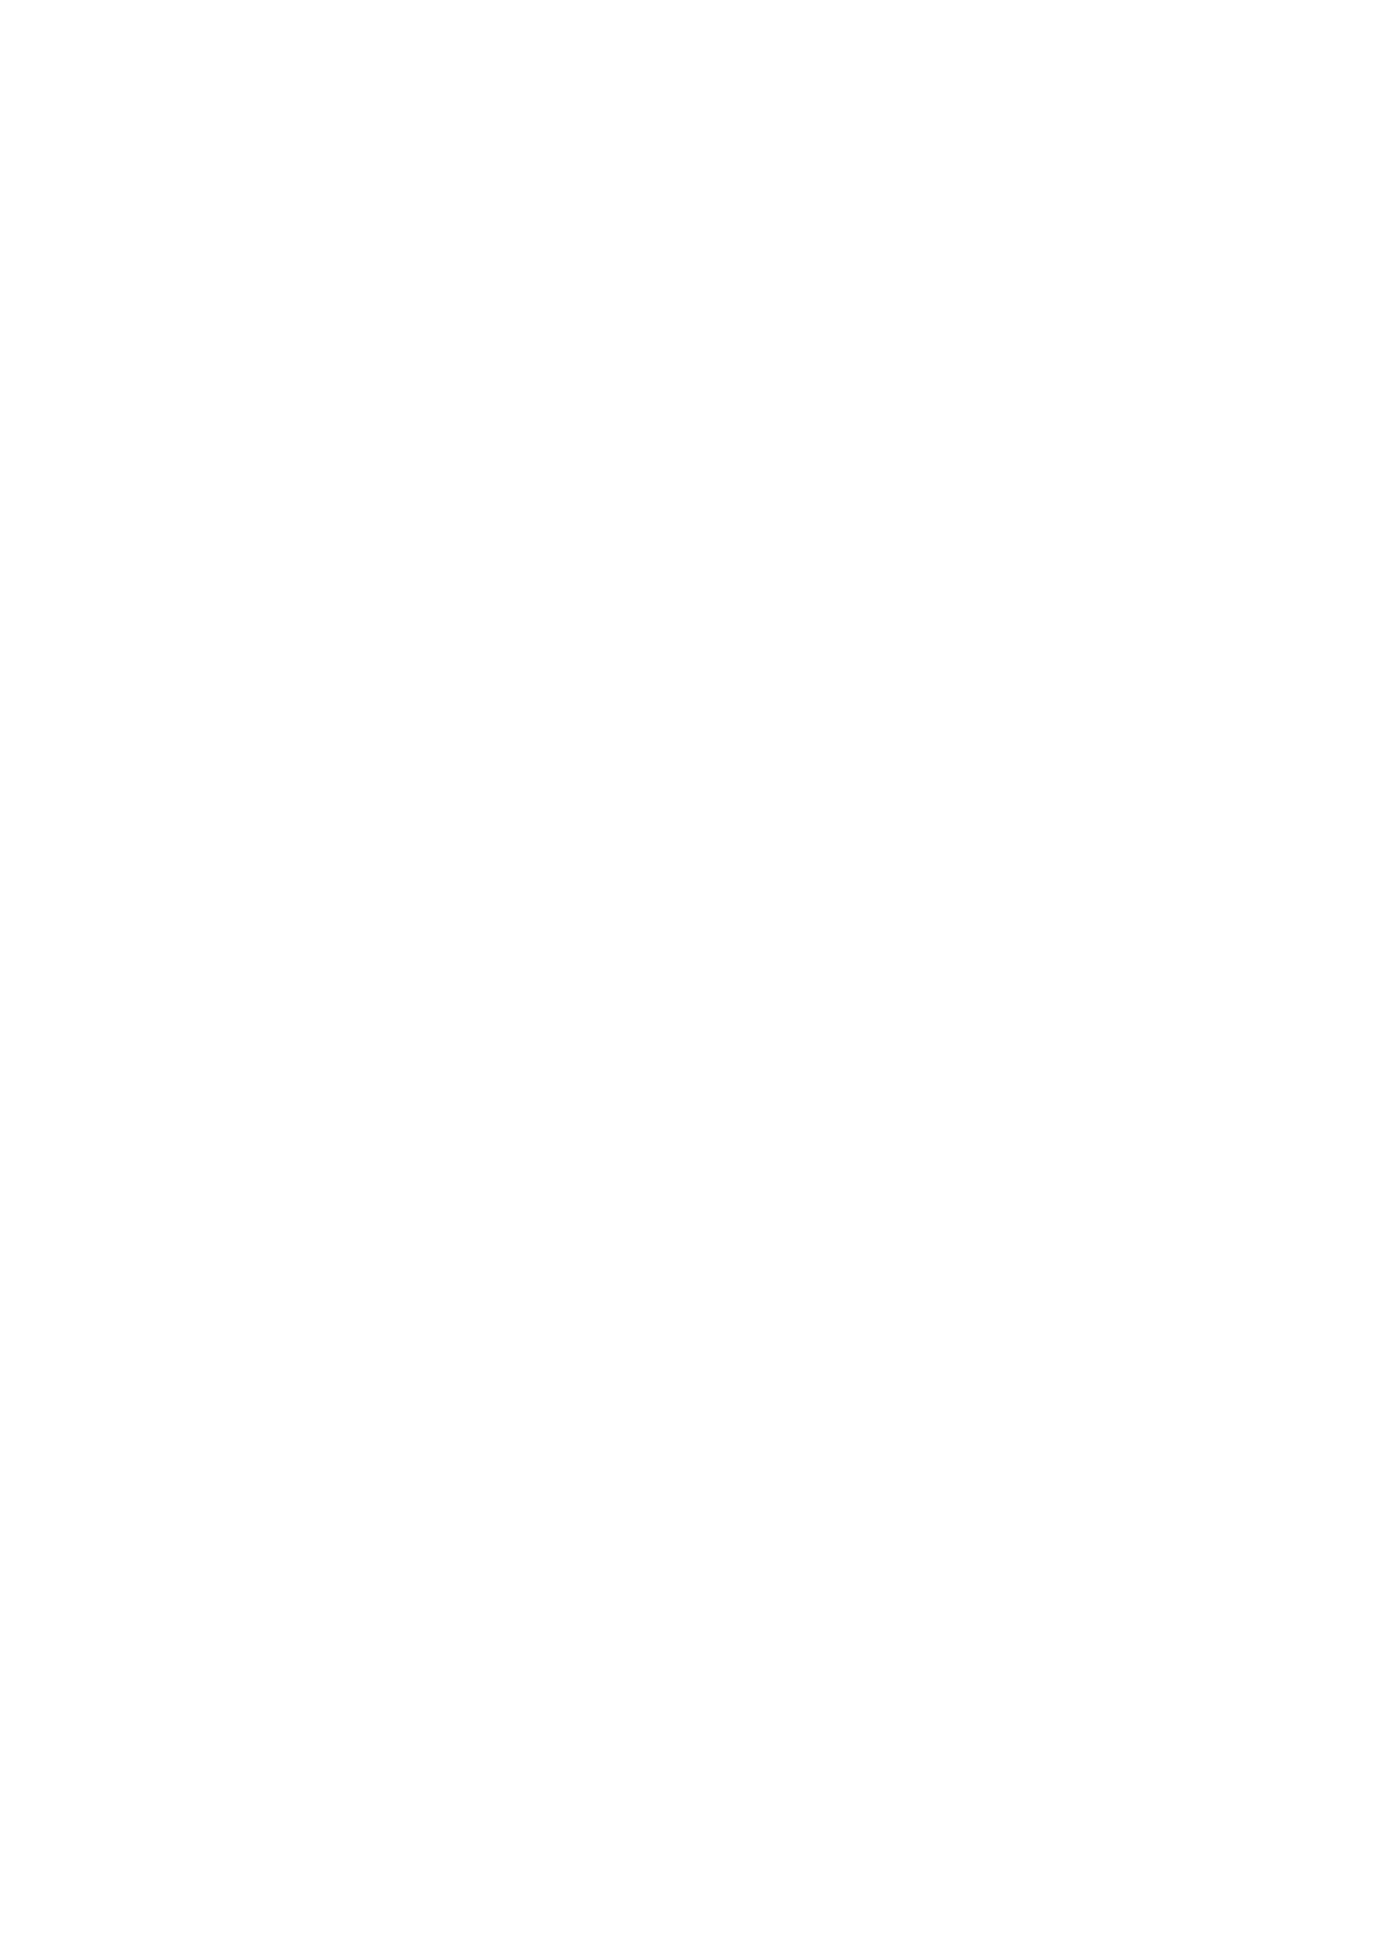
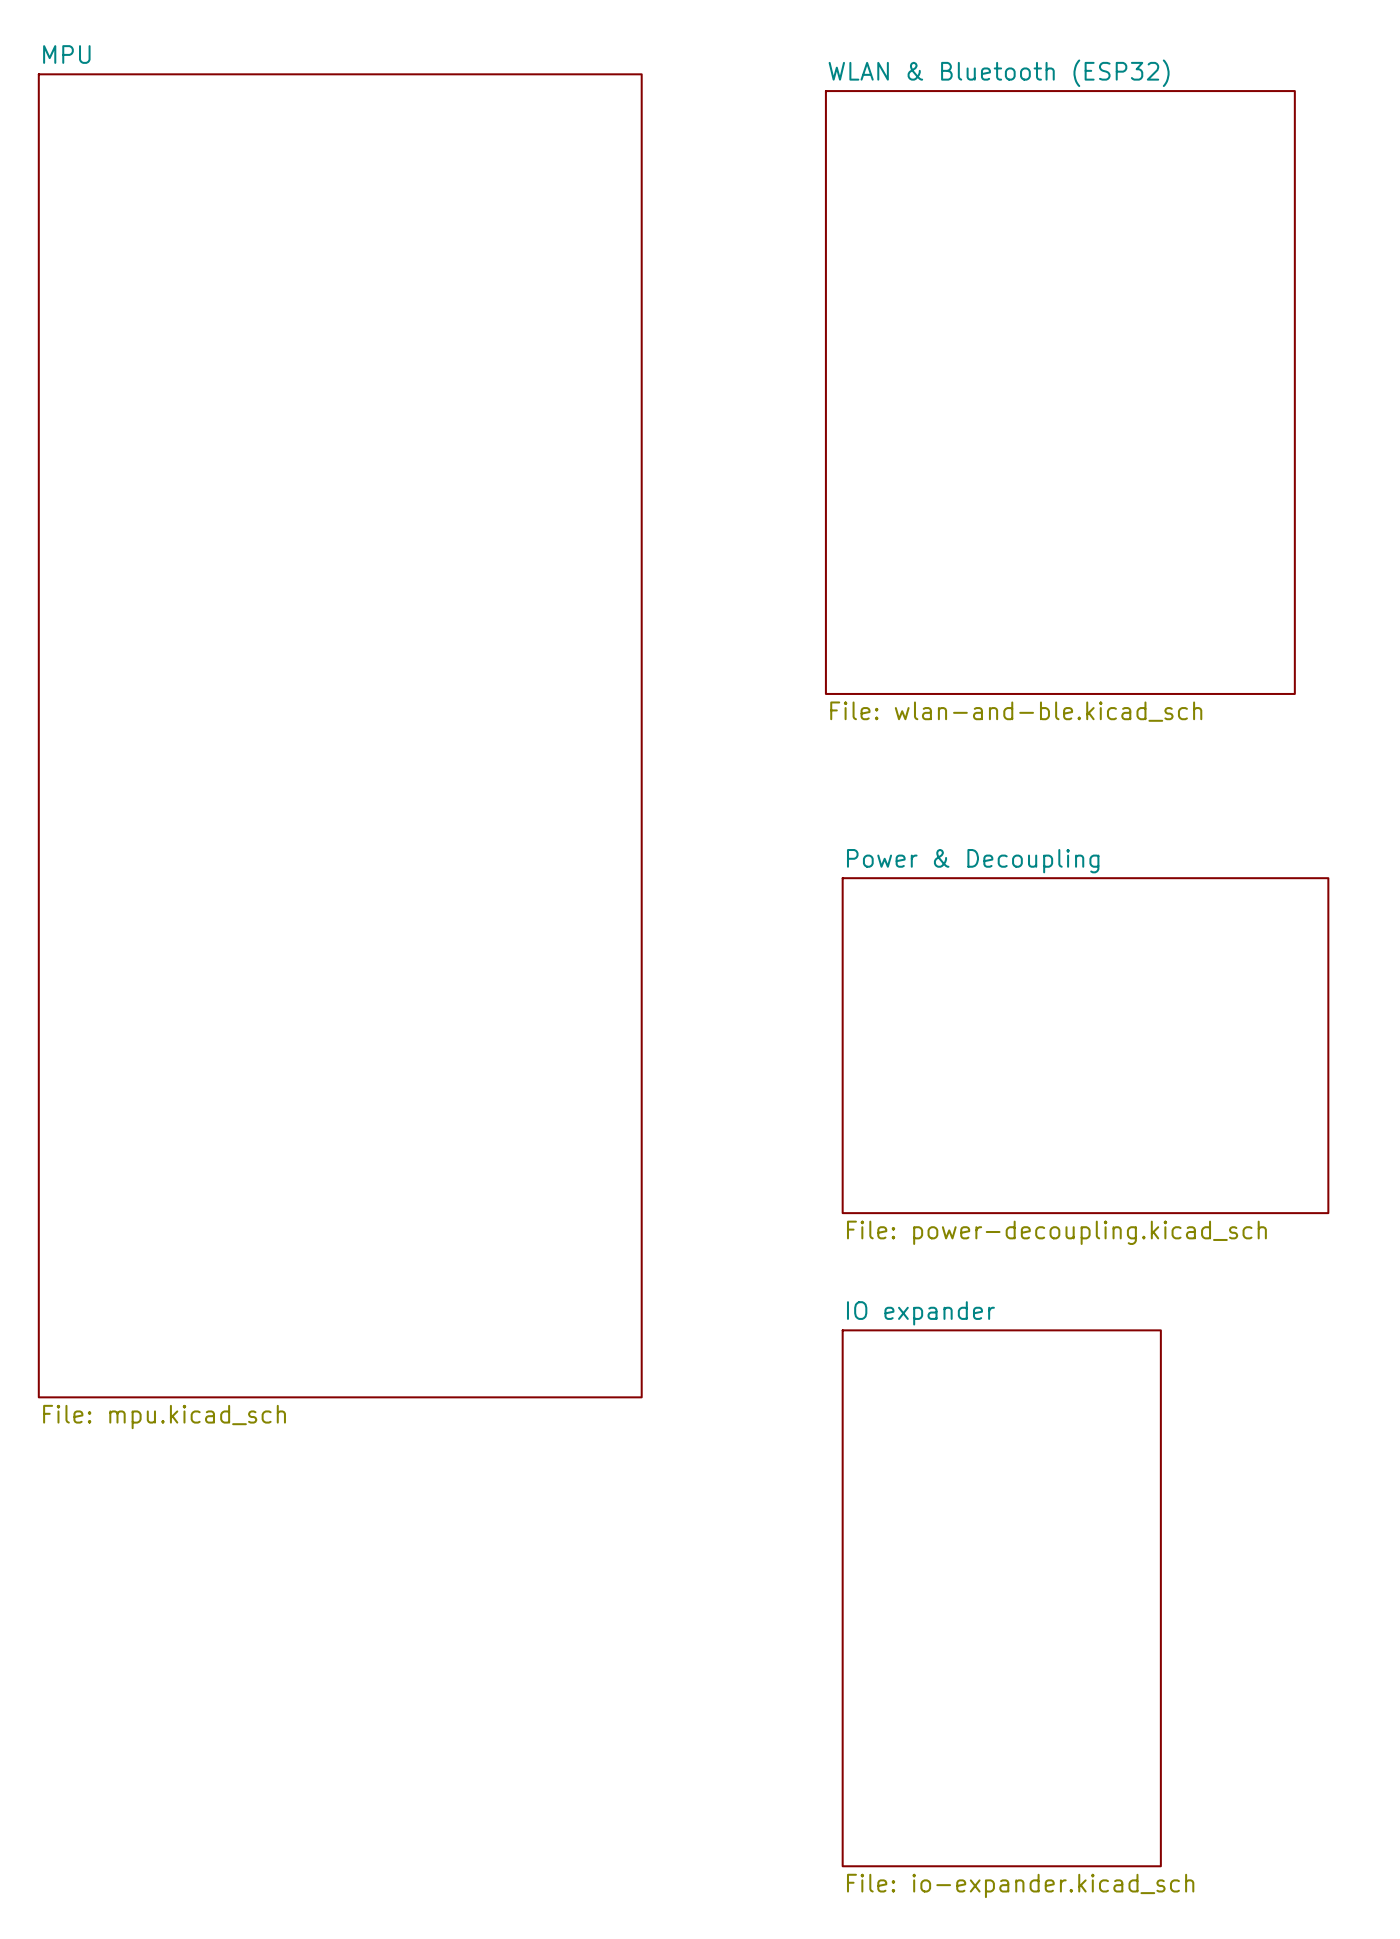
sheet WLAN & Bluetooth (ESP32): none -> File: wlan-and-ble.kicad_sch (1060, 392)
sheet MPU: none -> File: mpu.kicad_sch (340, 735)
sheet Power & Decoupling: none -> File: power-decoupling.kicad_sch (1085, 1045)
sheet IO expander: none -> File: io-expander.kicad_sch (1001, 1598)

